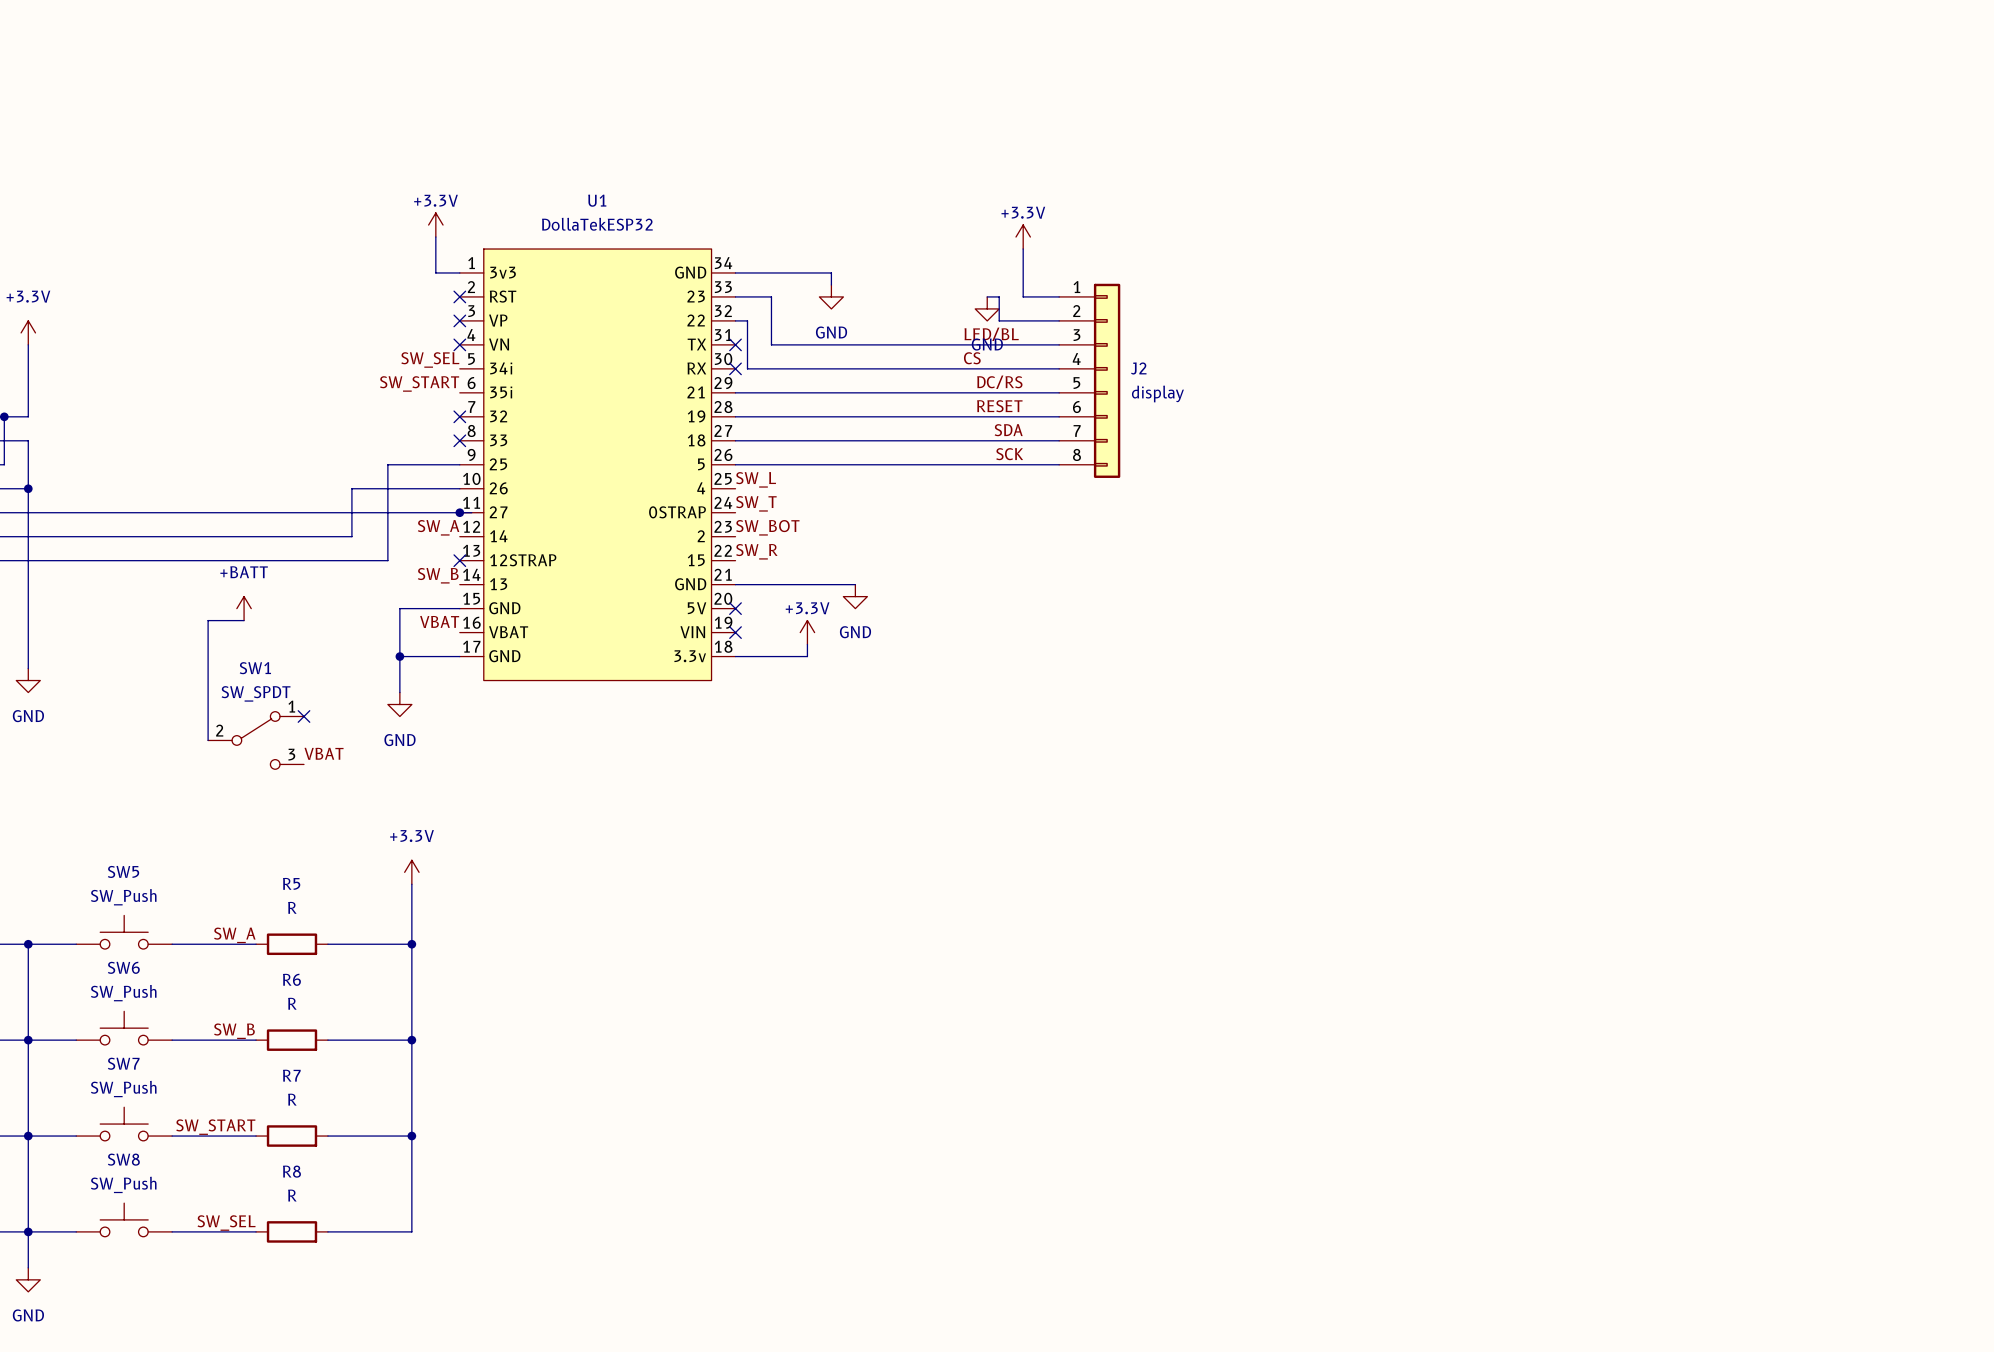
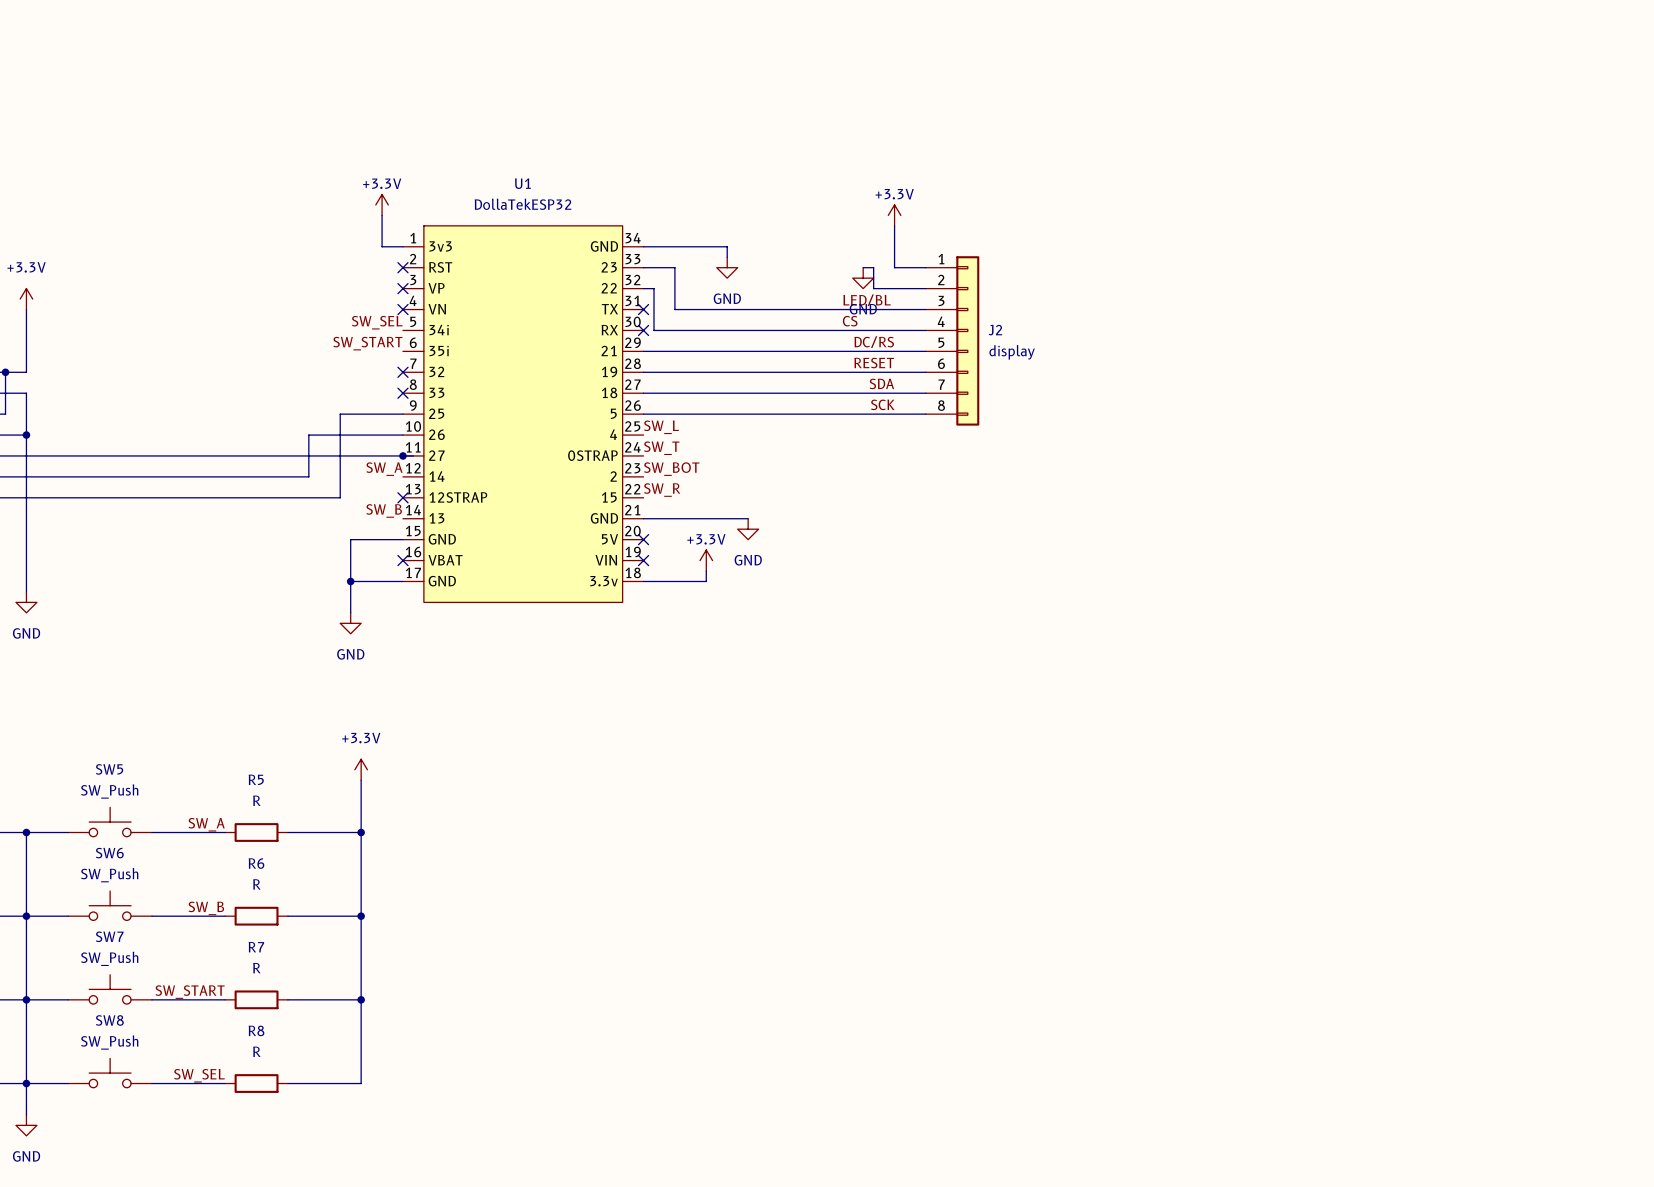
power symbol: +BATT (244, 608) -> none
wire: (244, 620) (208, 620) (208, 740) -> none
label: VBAT (439, 621) -> none
no-connect mark: none -> (402, 560)
no-connect mark: (303, 716) -> none
SW1: SW_SPDT (256, 740) -> none
label: VBAT (324, 753) -> none

